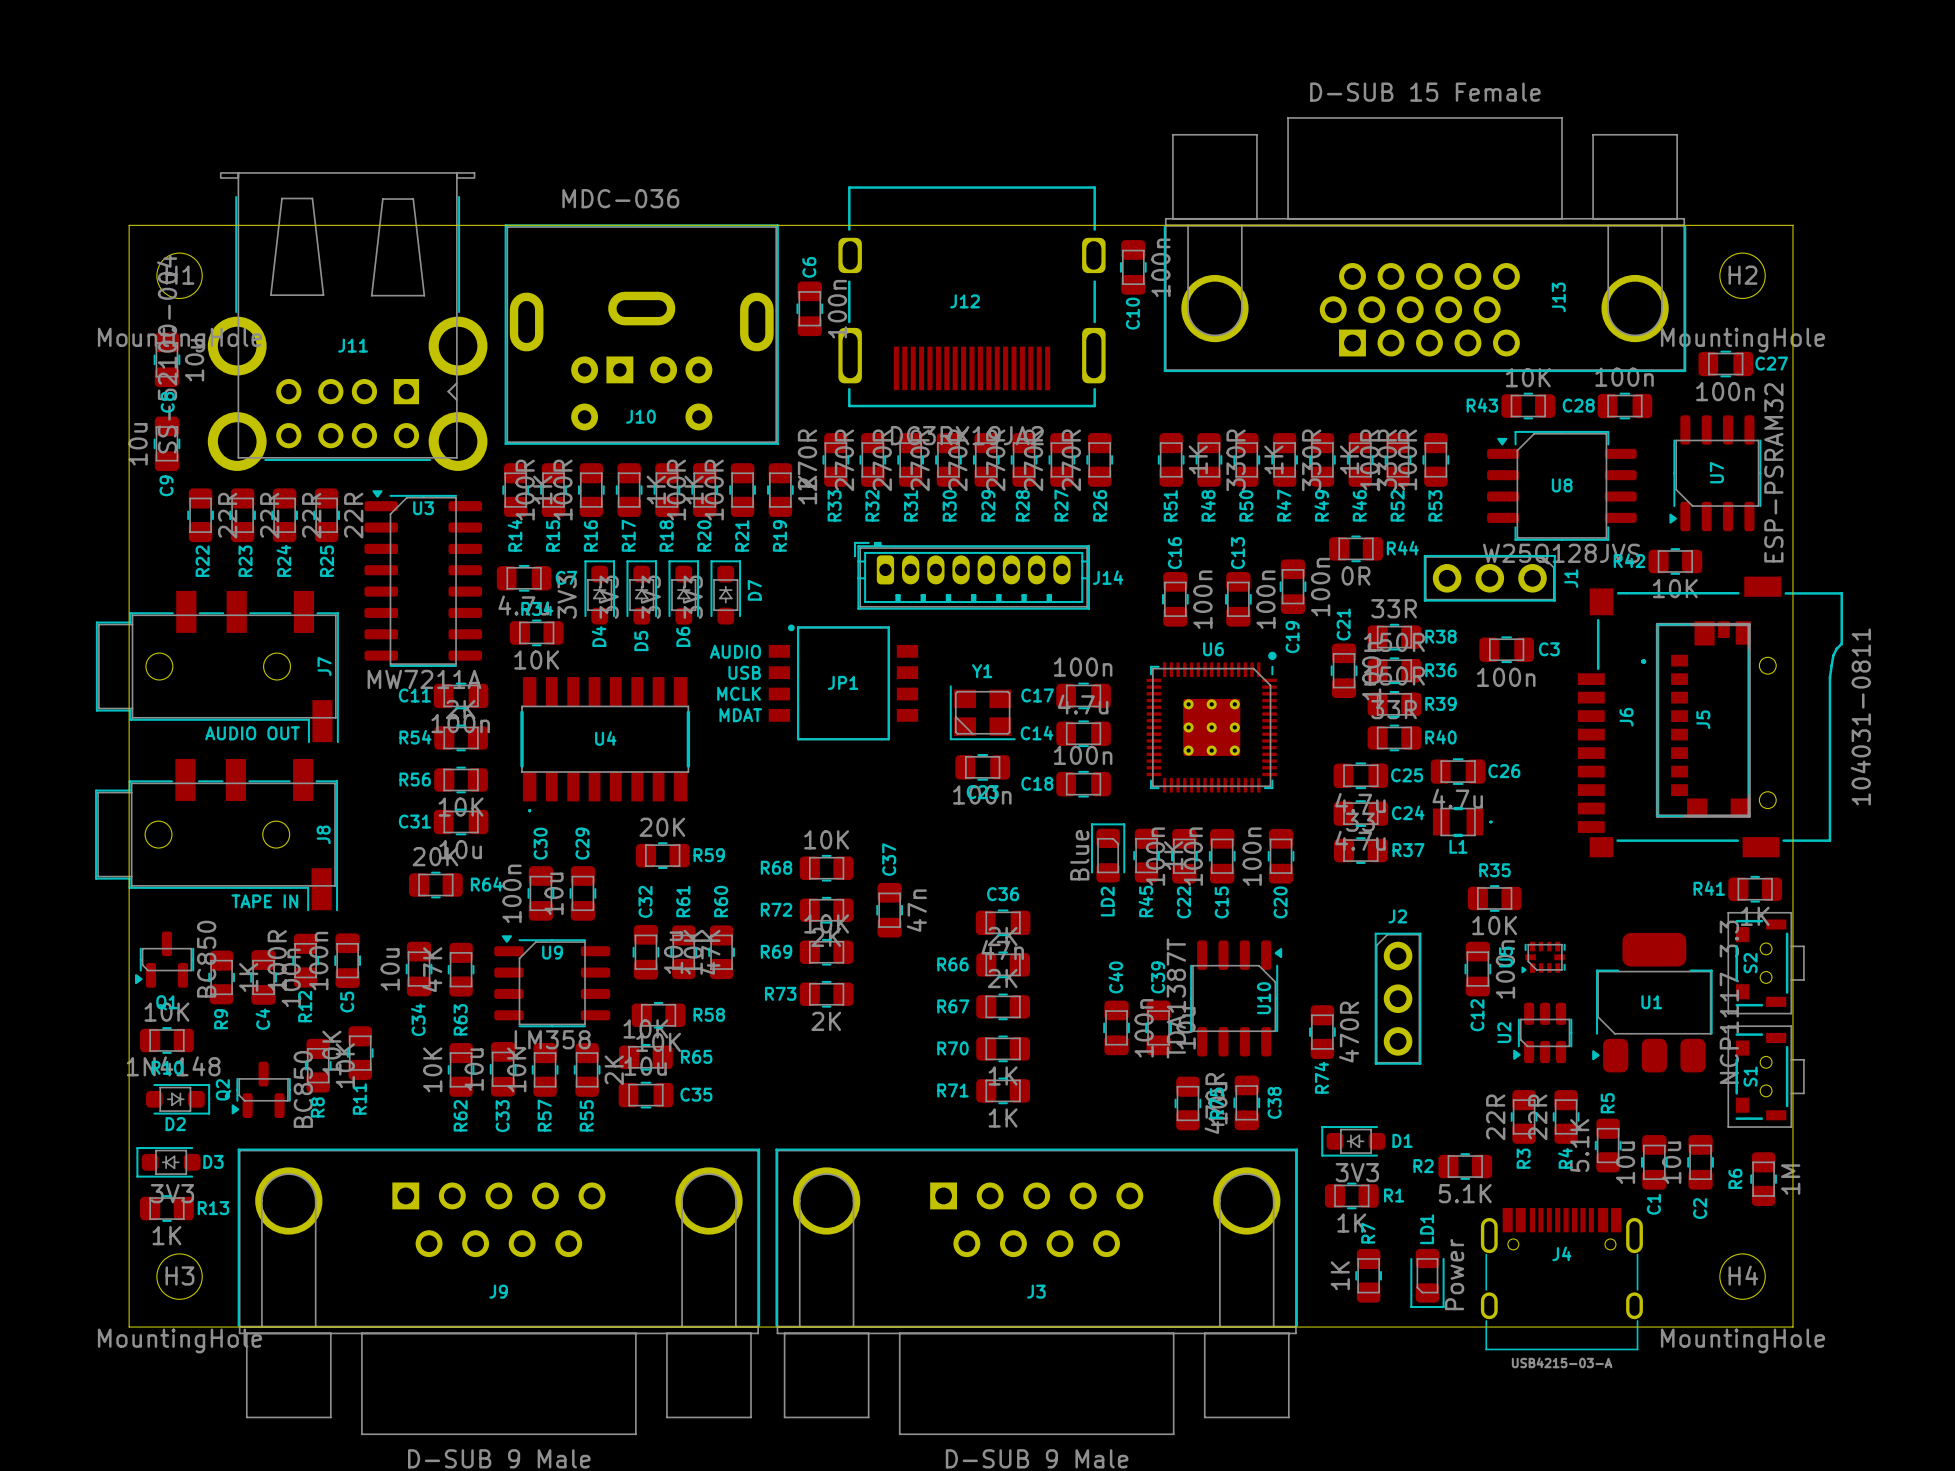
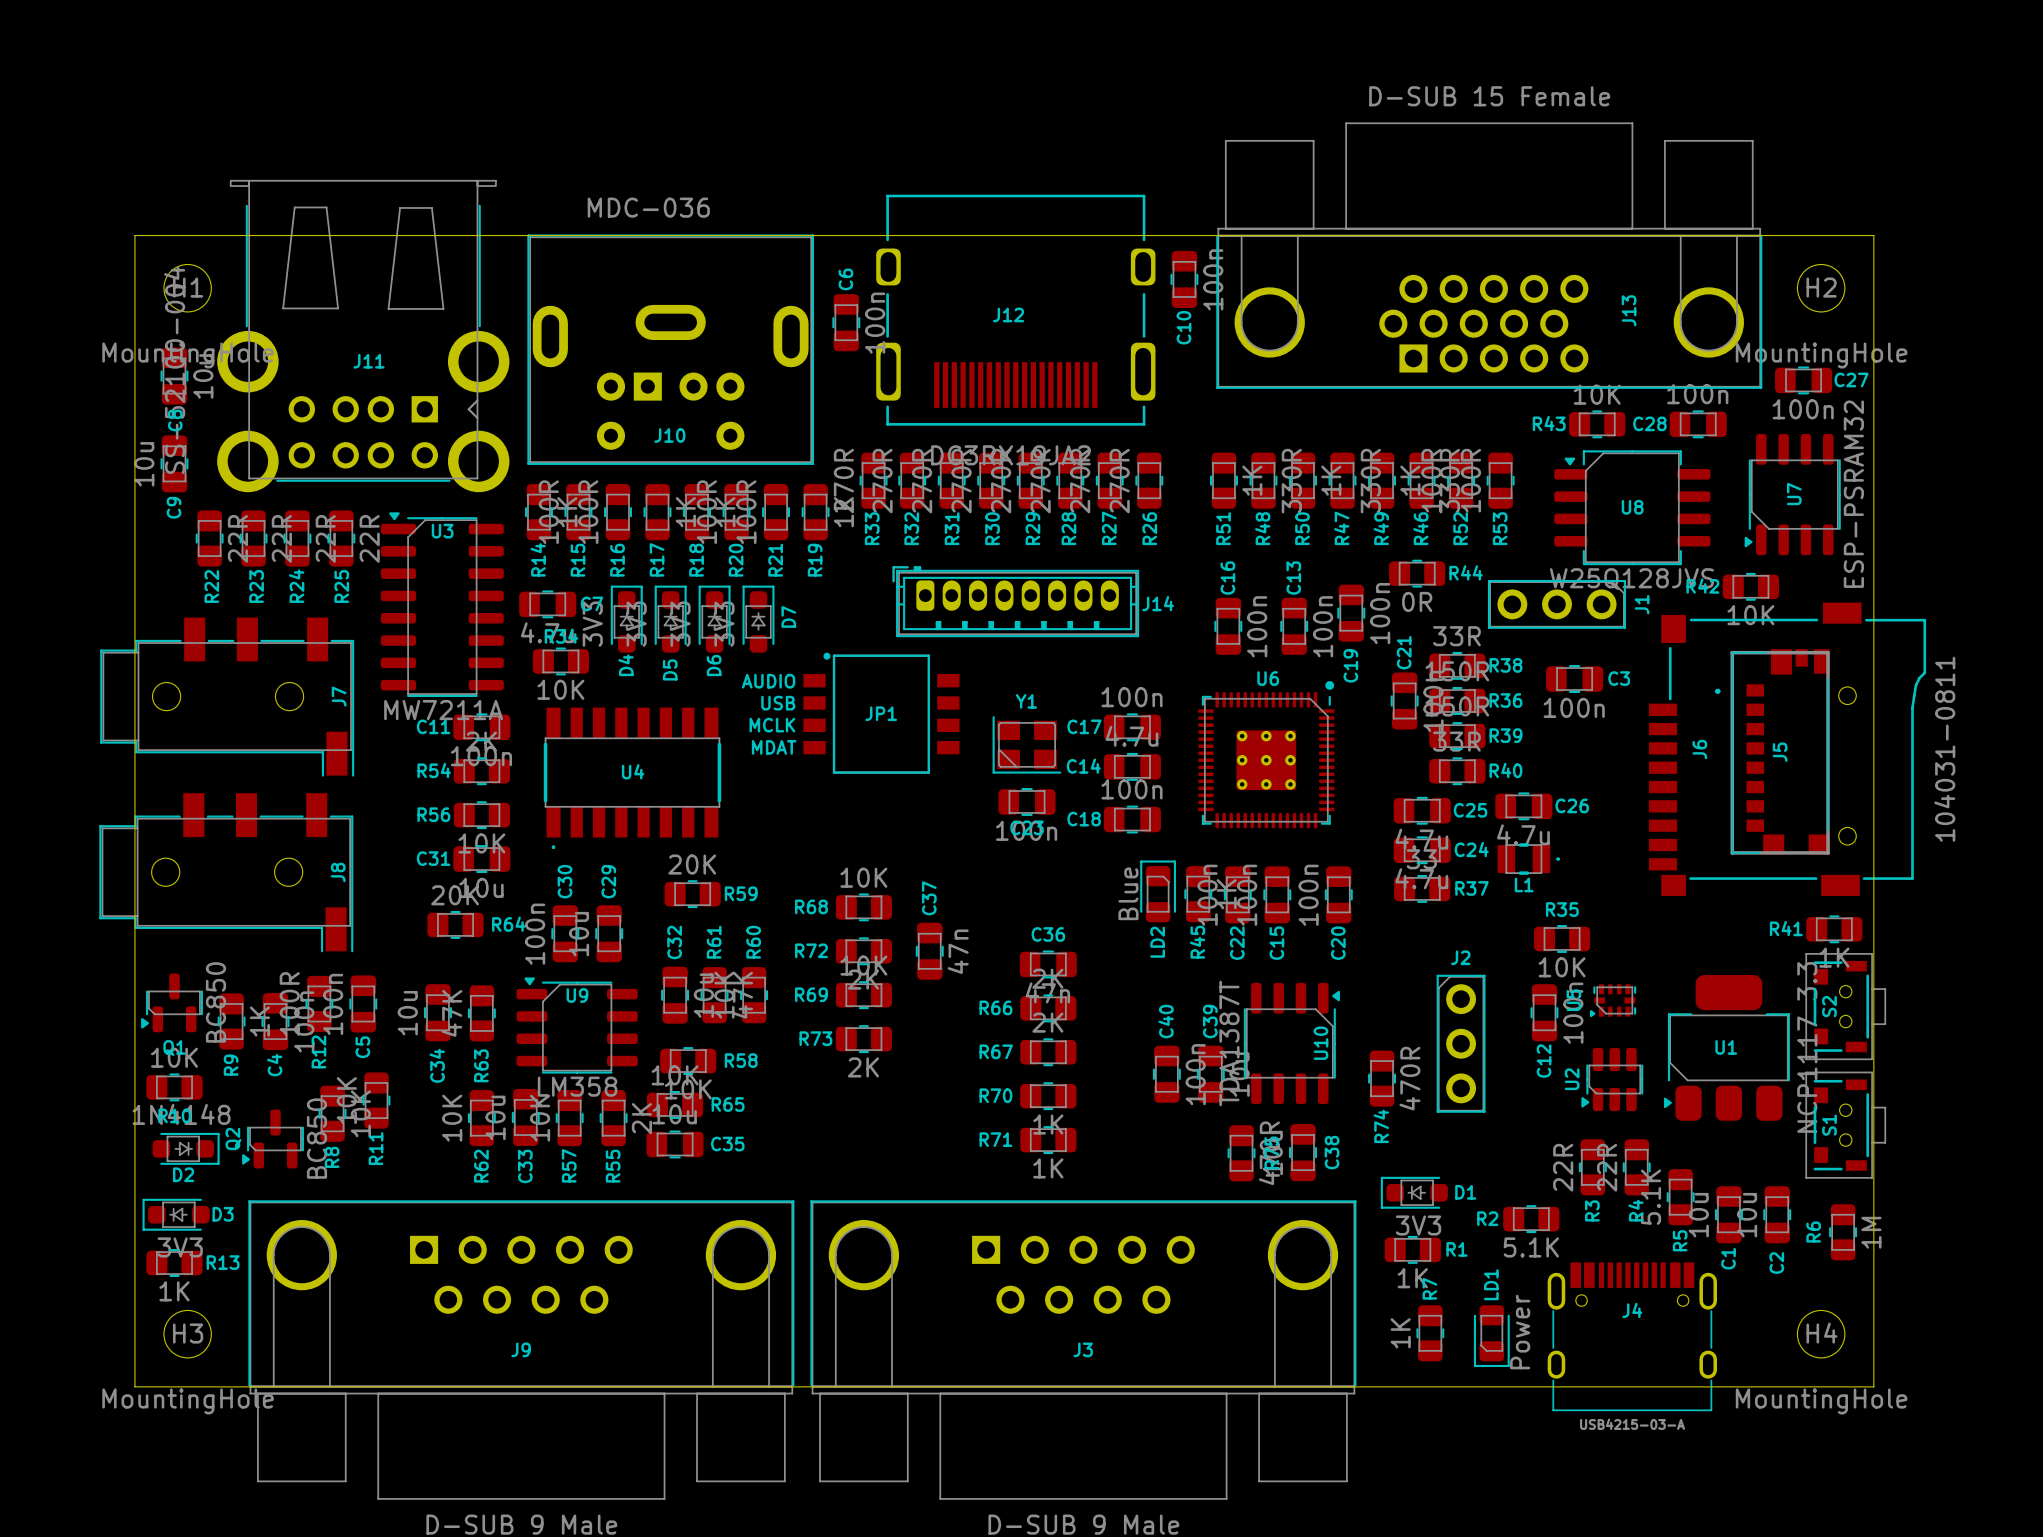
text: AUDIO OUT (252, 733) -> none
text: TAPE IN (264, 901) -> none
R5 name position: R5 (1607, 1103) -> R5 (1680, 1240)

